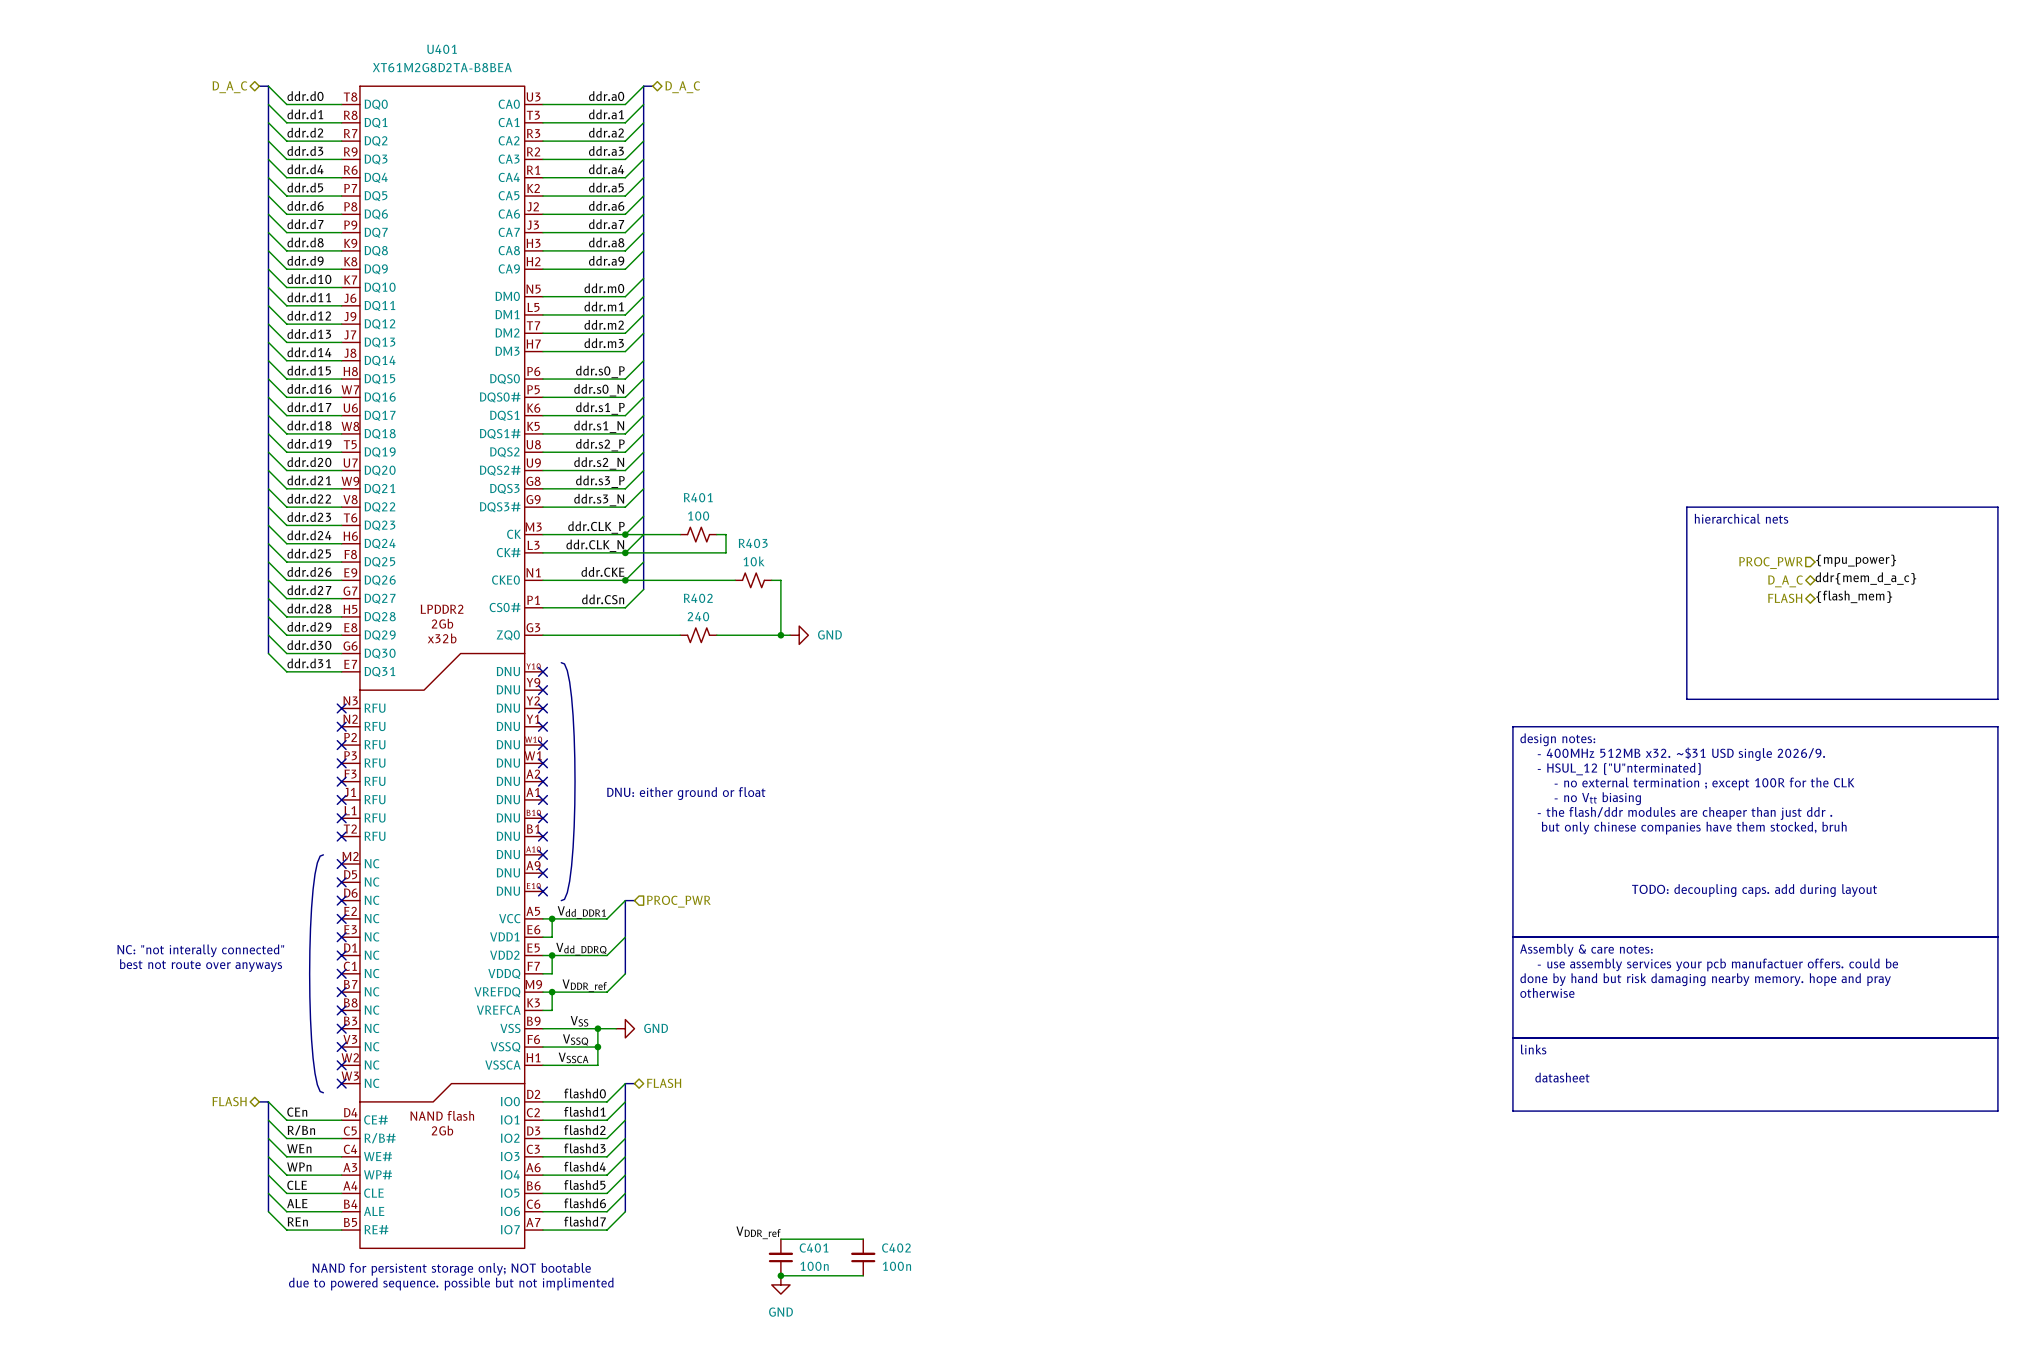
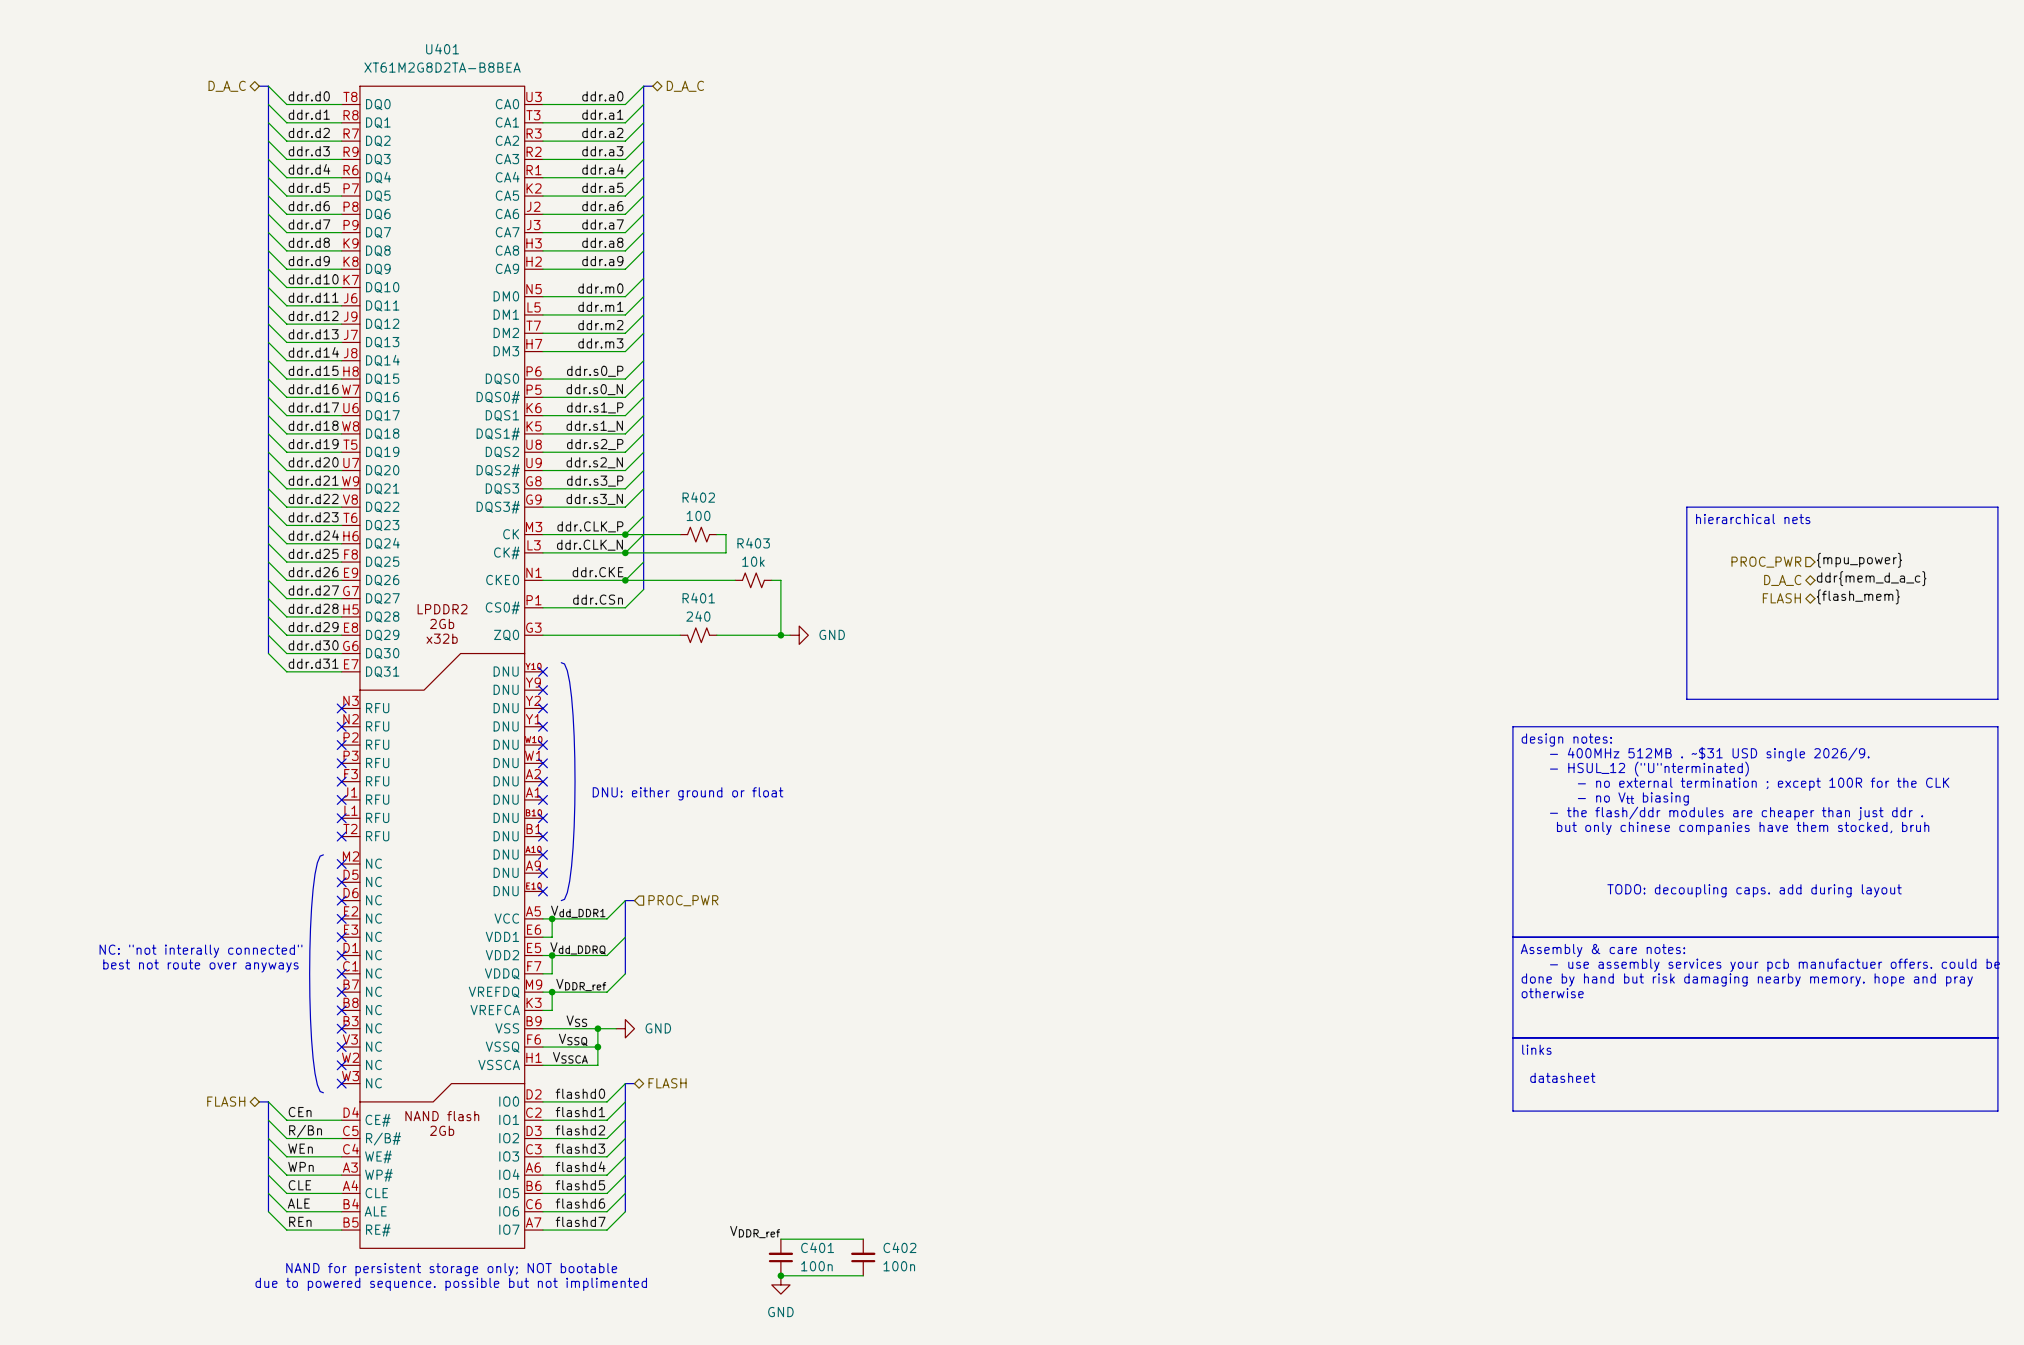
R401 name: R401 (698, 497) -> R402 (698, 497)
R402 name: R402 (698, 598) -> R401 (698, 598)
text: - 400MHz 512MB x32. ~$31 USD single 2026/9. (1681, 754) -> - 400MHz 512MB . ~$31 USD single 2026/9. (1709, 754)

